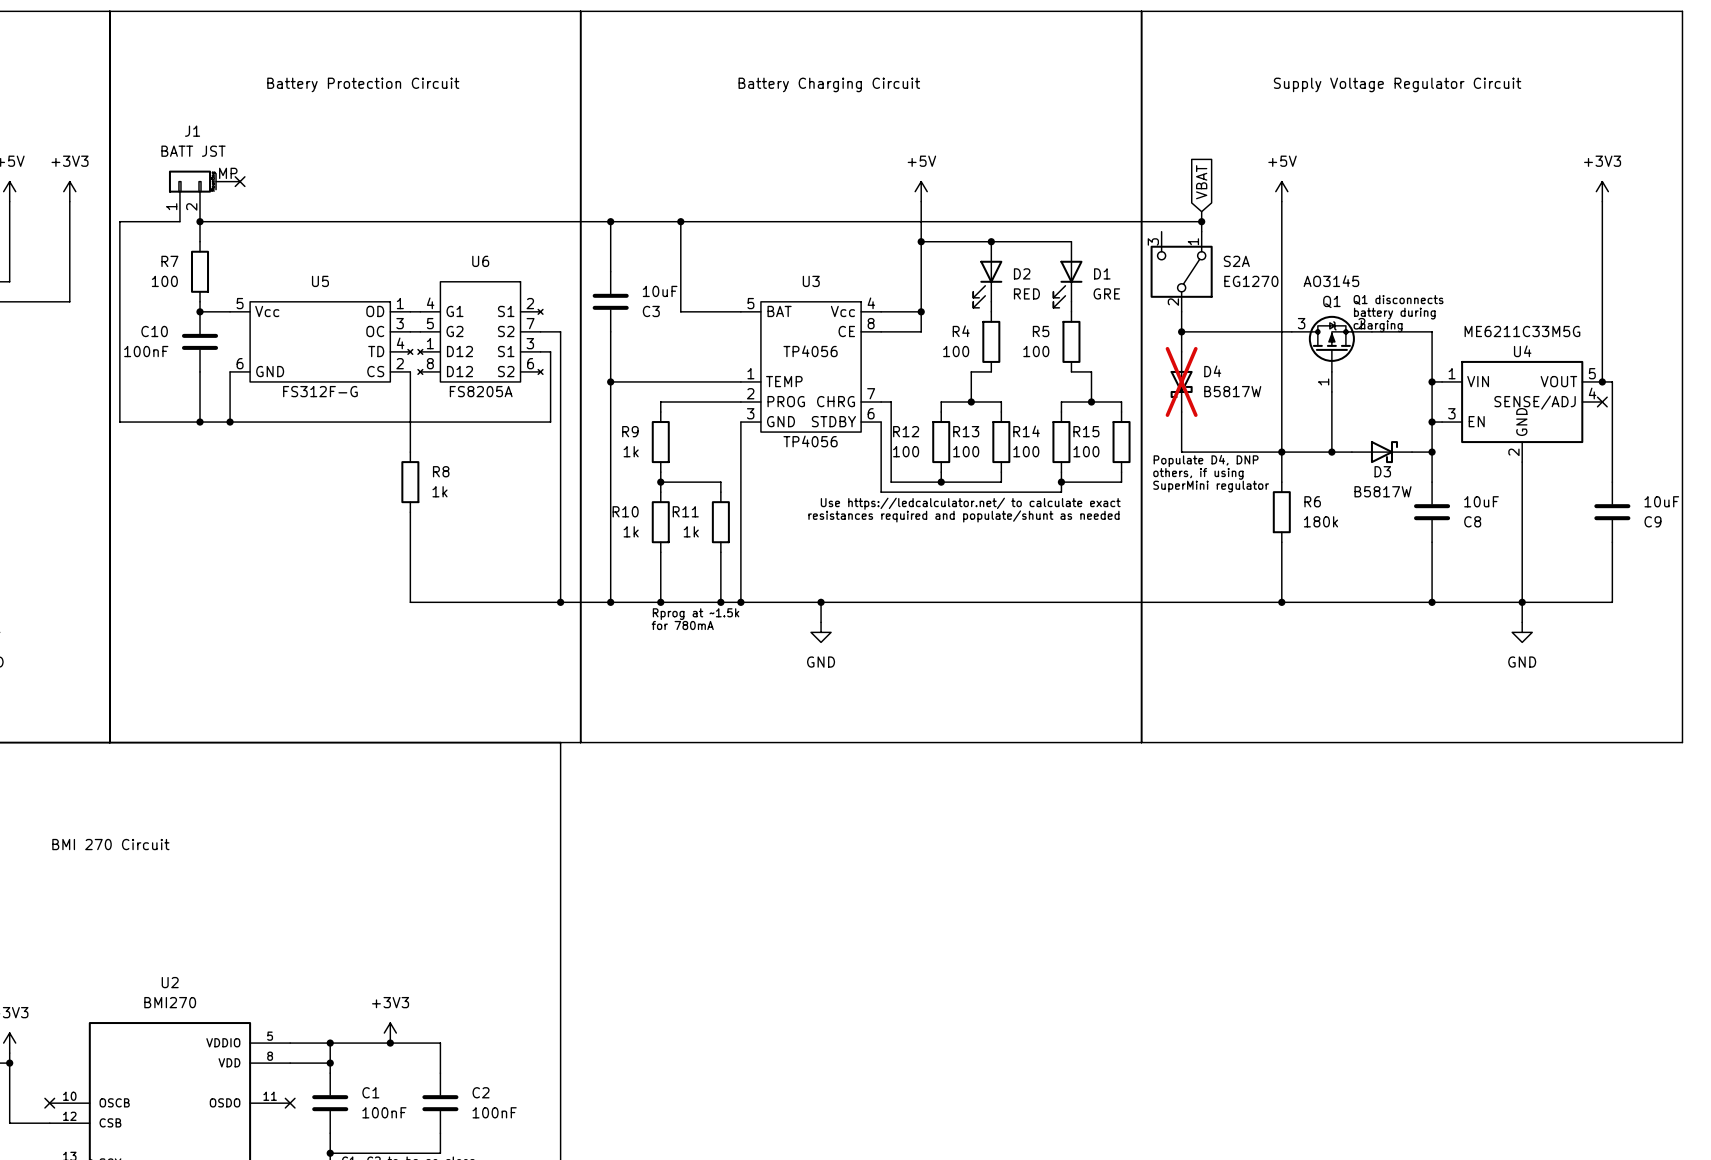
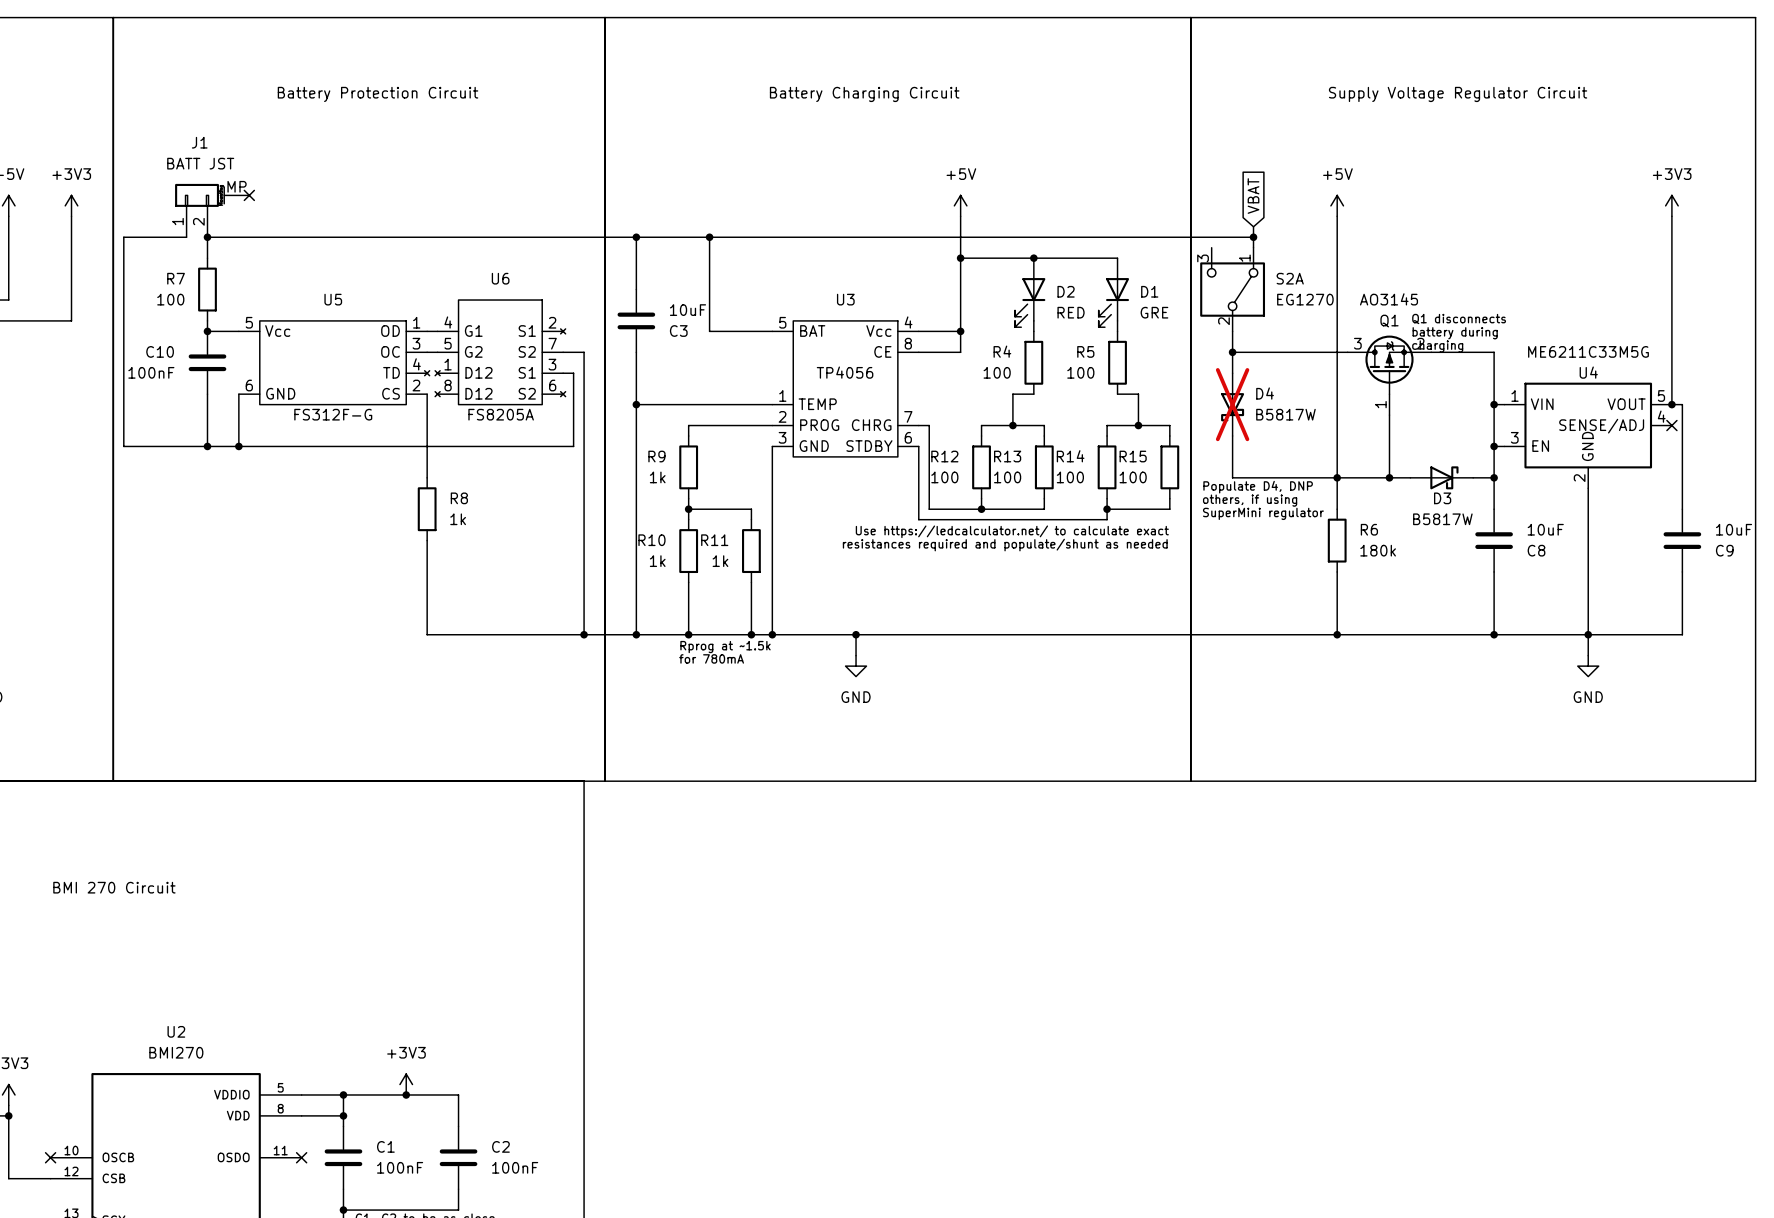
U3 value: TP4056 (810, 441) -> none

